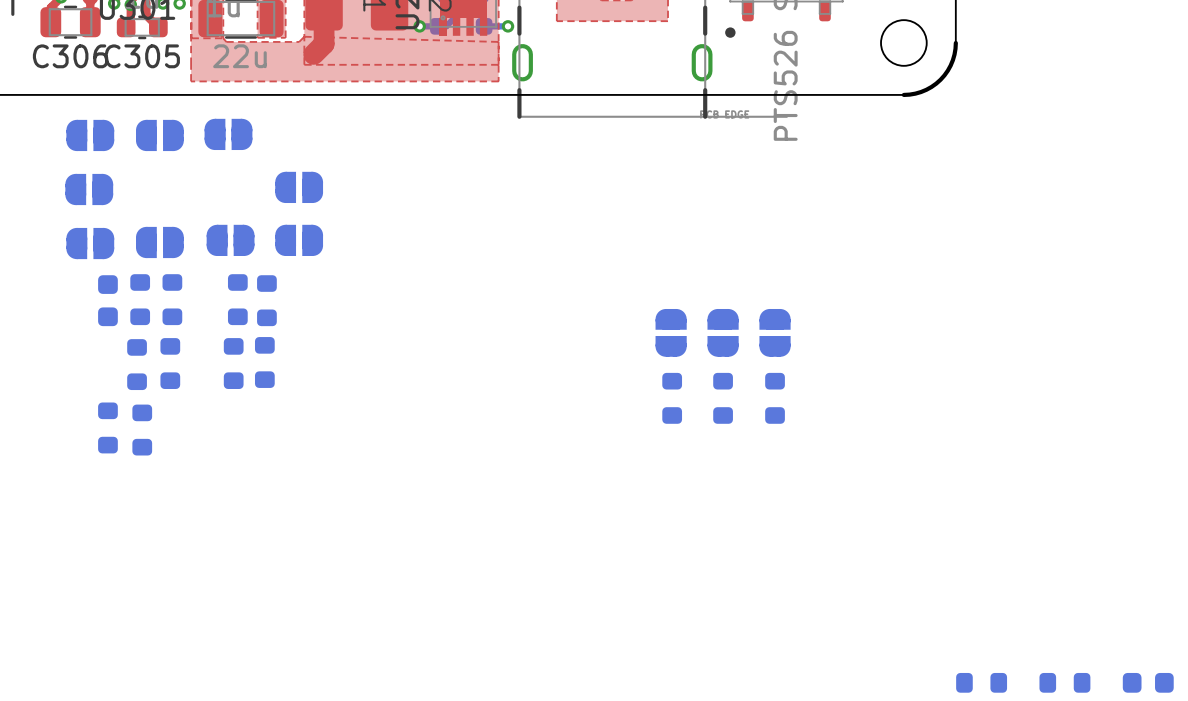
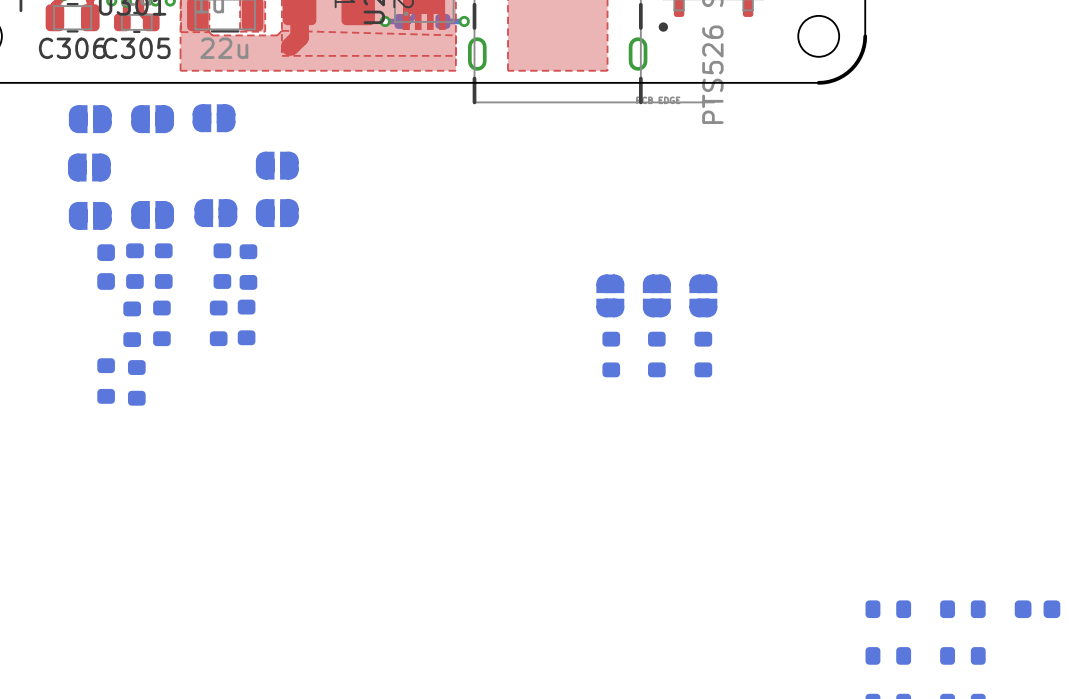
top zone outline: (556, 21) (668, 21) -> (508, 16) (508, 70) (607, 70) (607, 16)

